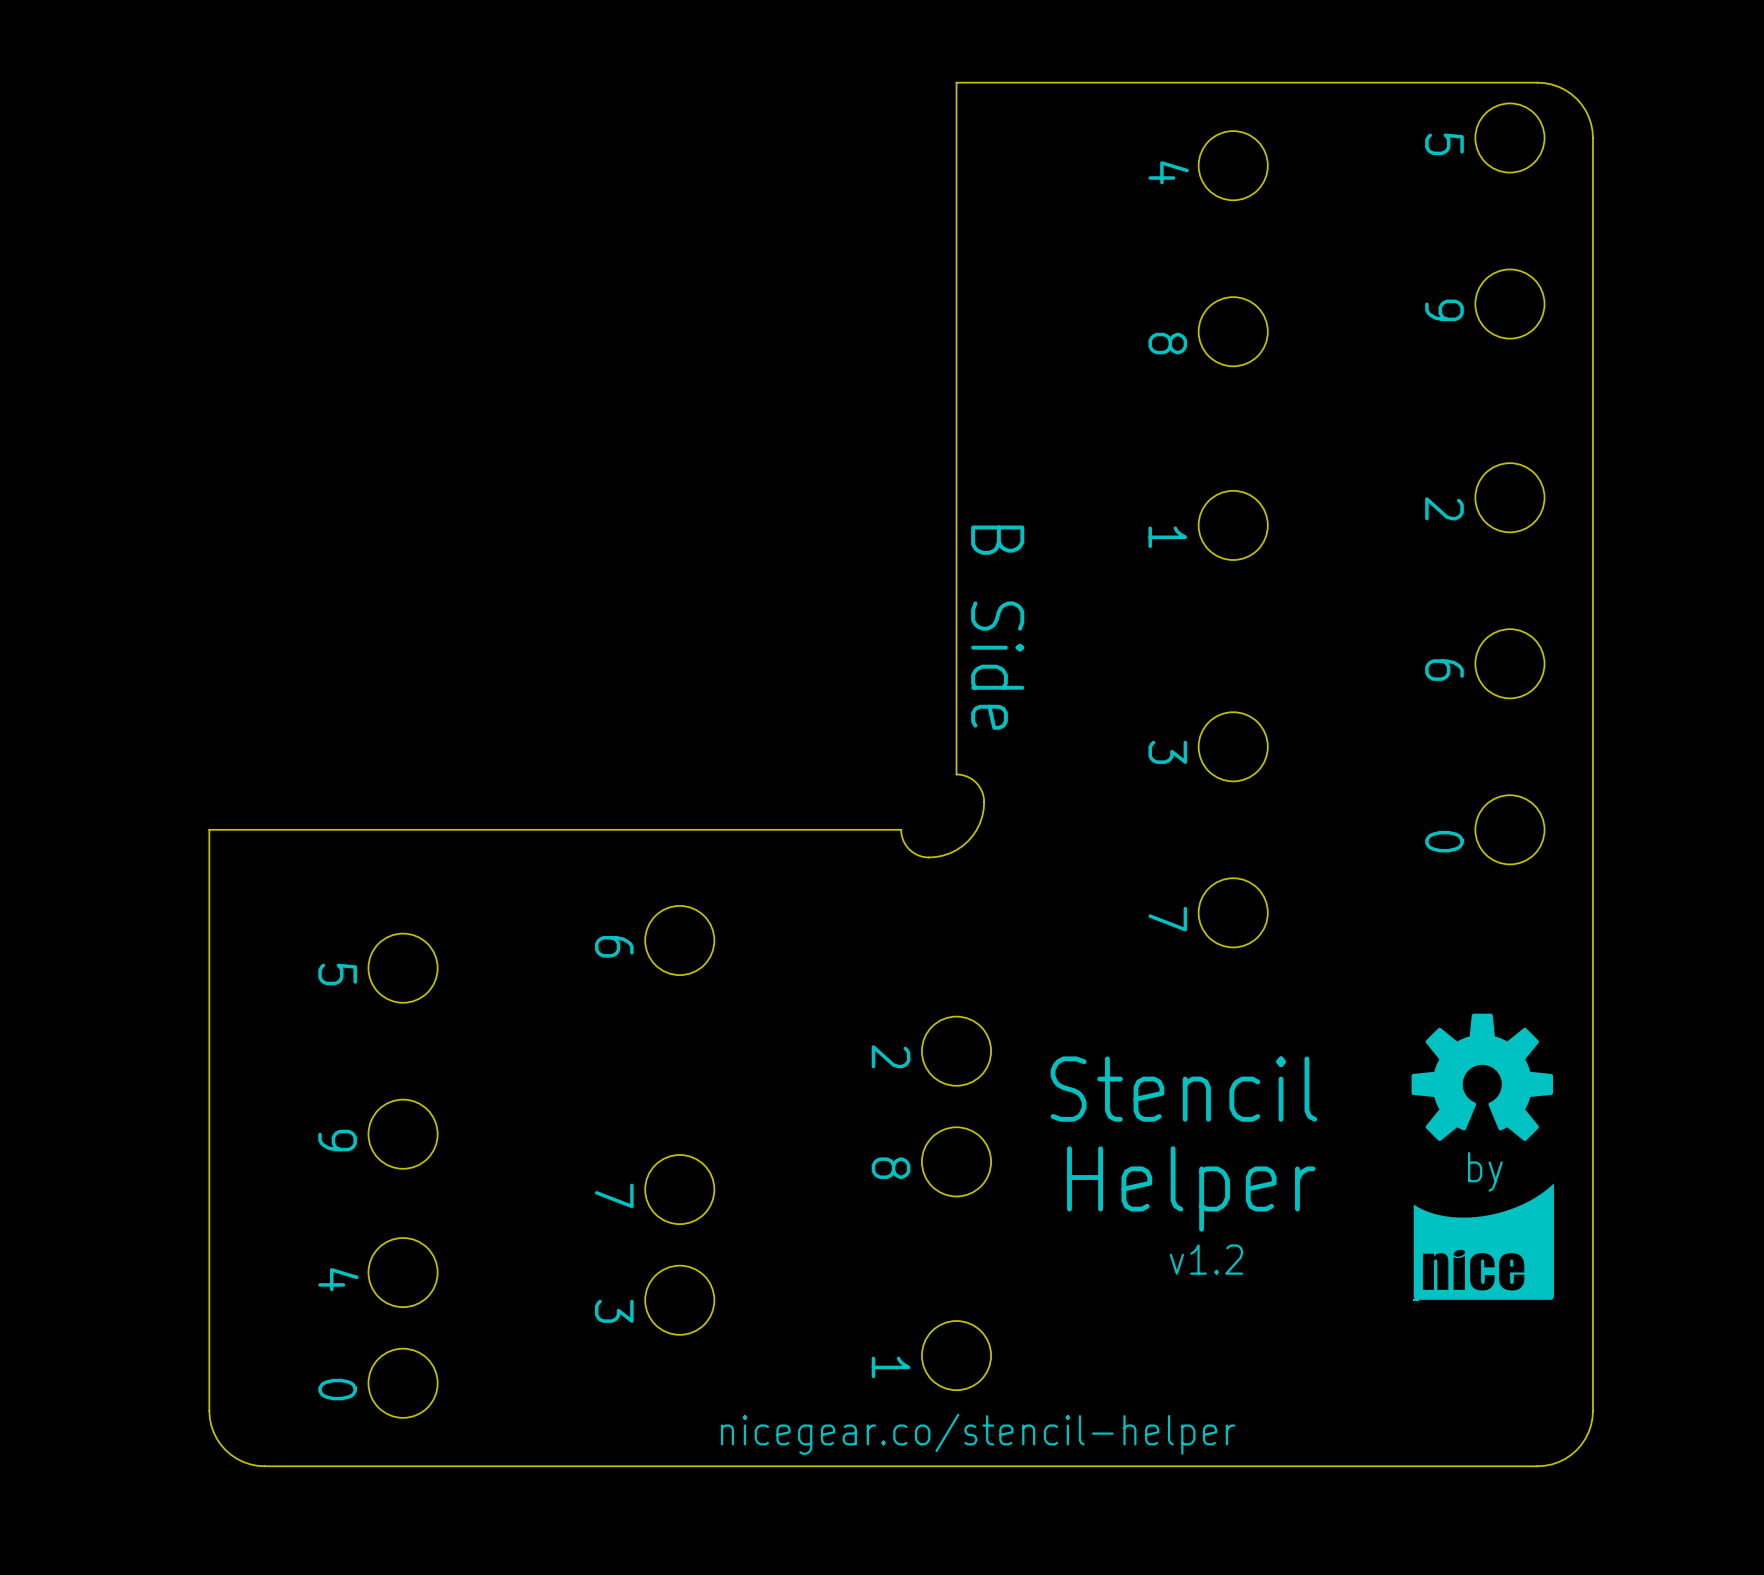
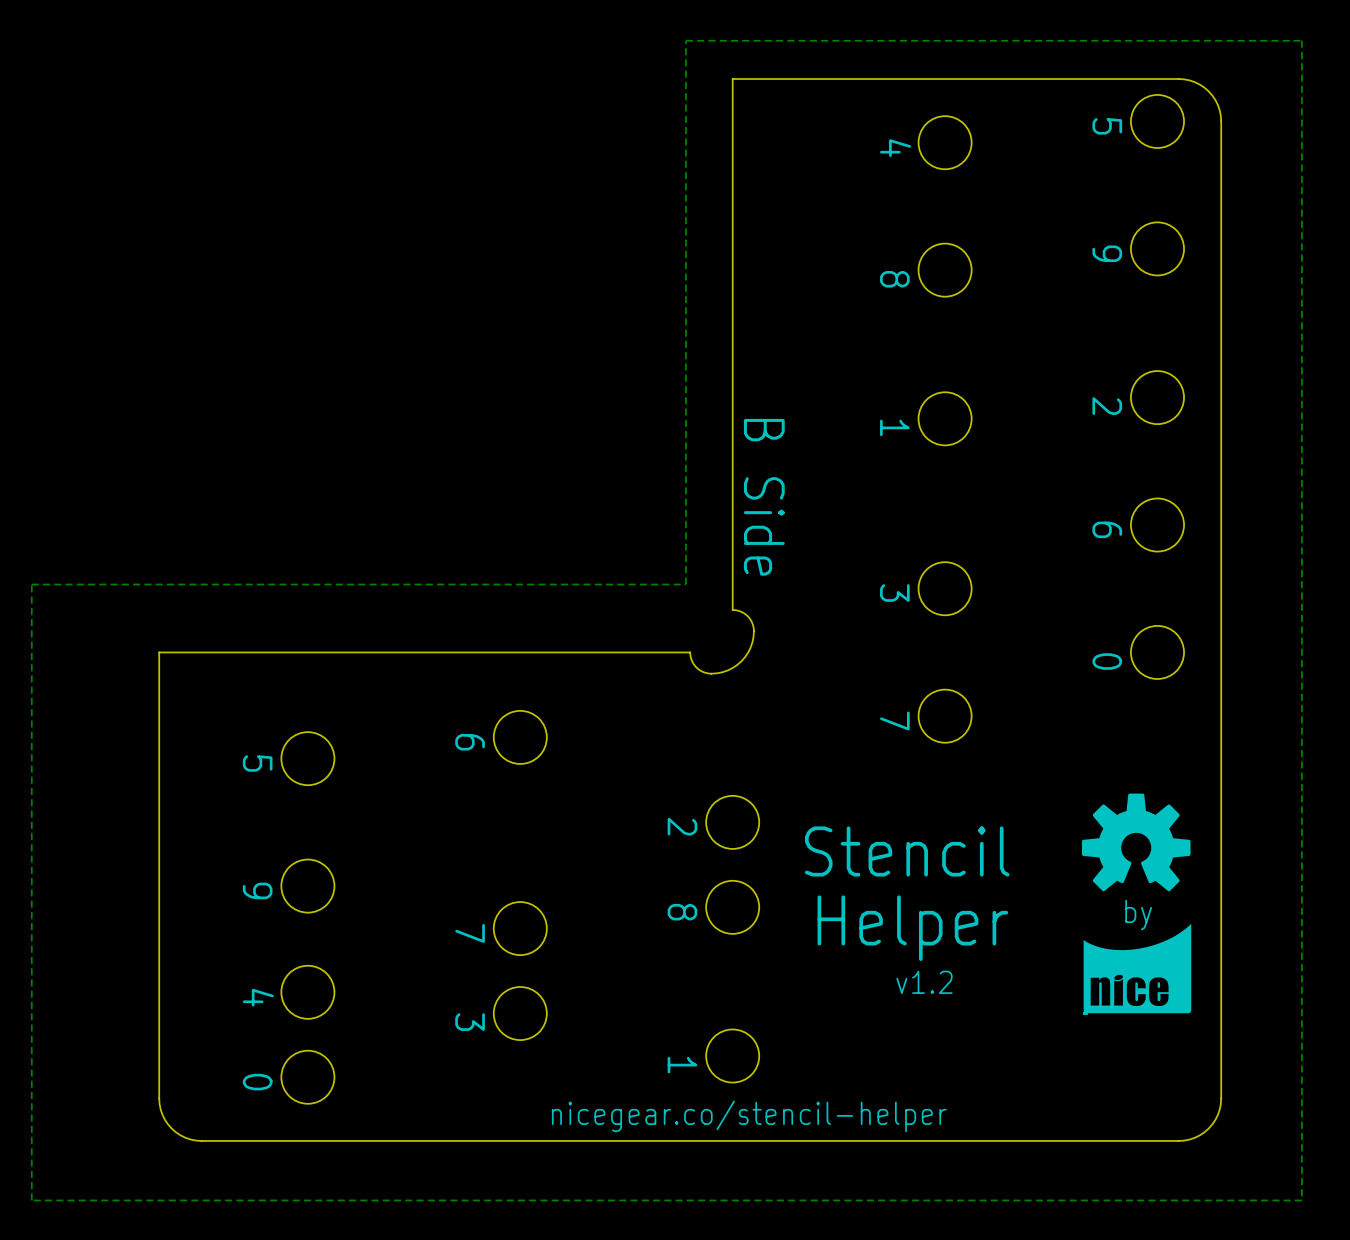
zone outline: none -> (1301, 40) (685, 40) (685, 584) (31, 584) (31, 1200) (1301, 1200) (1301, 40)

